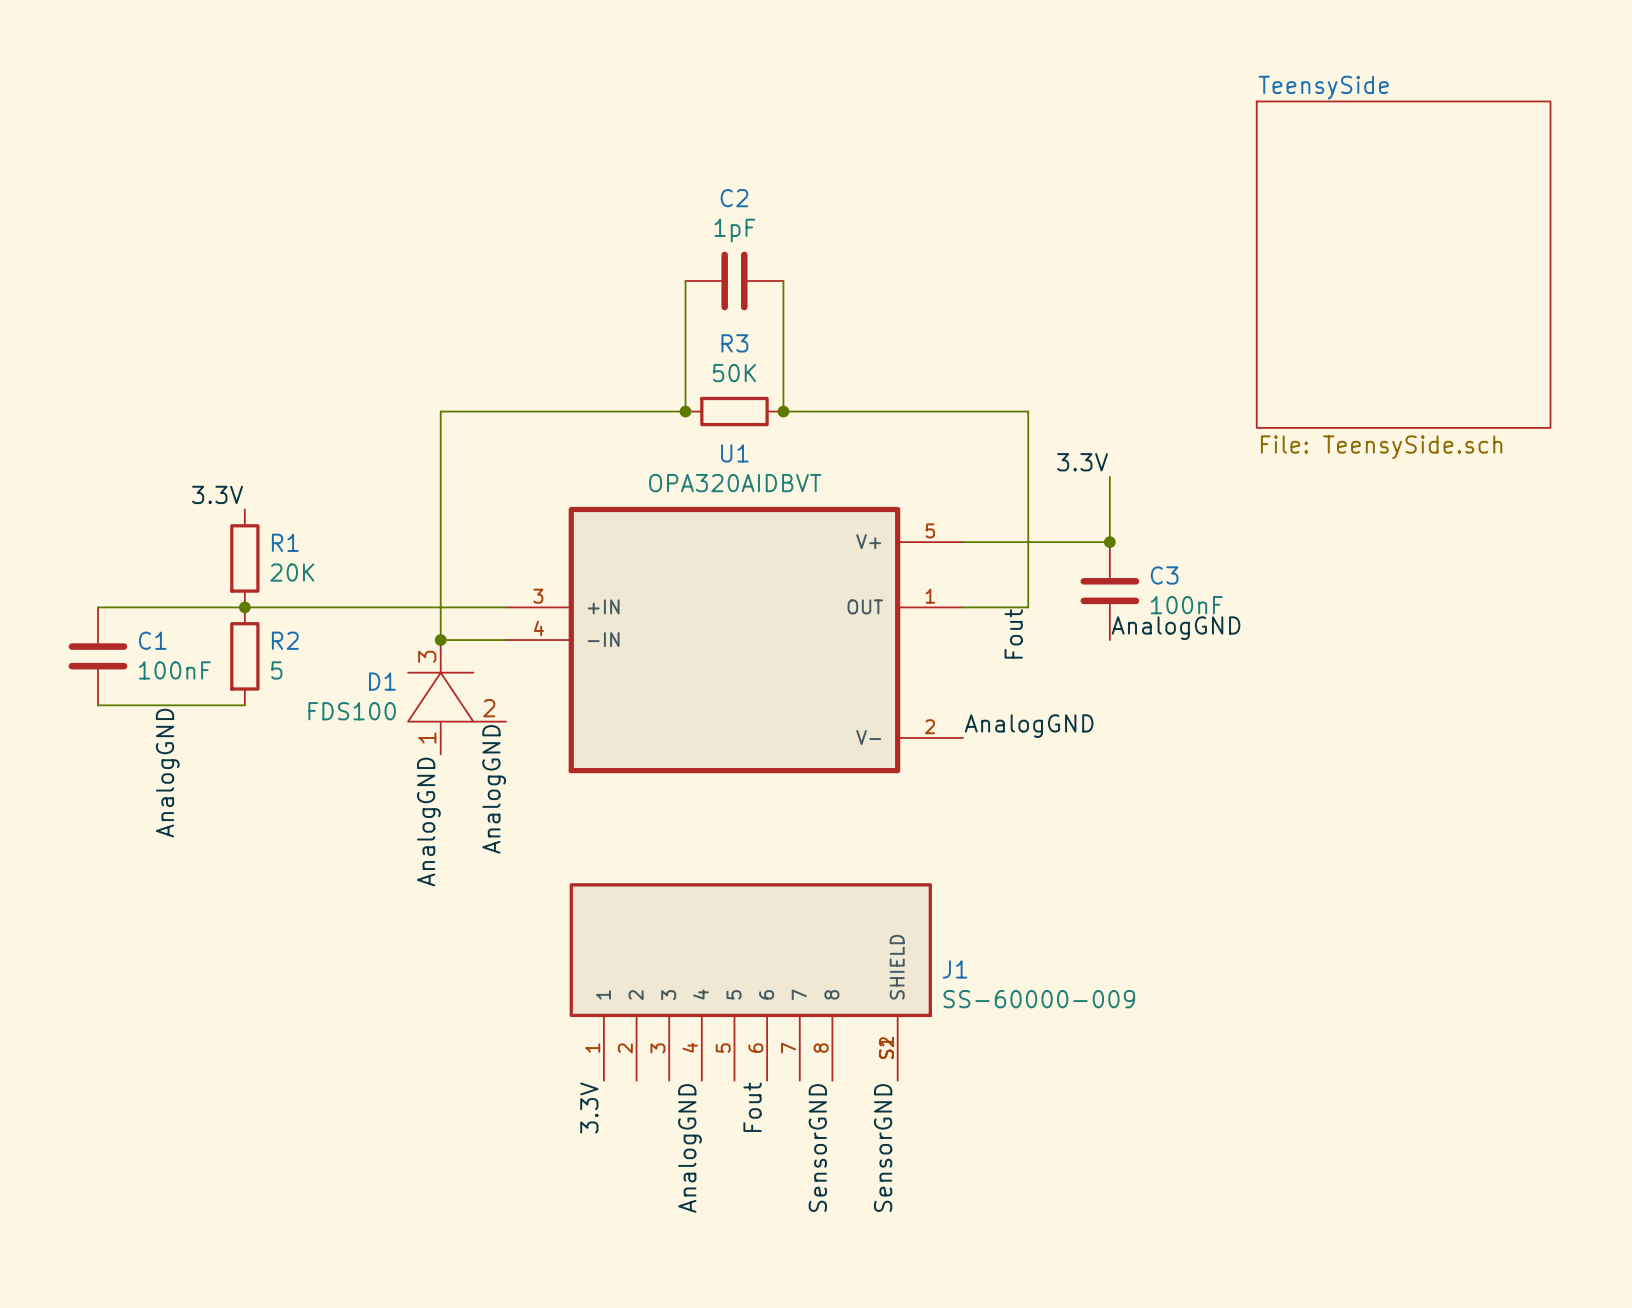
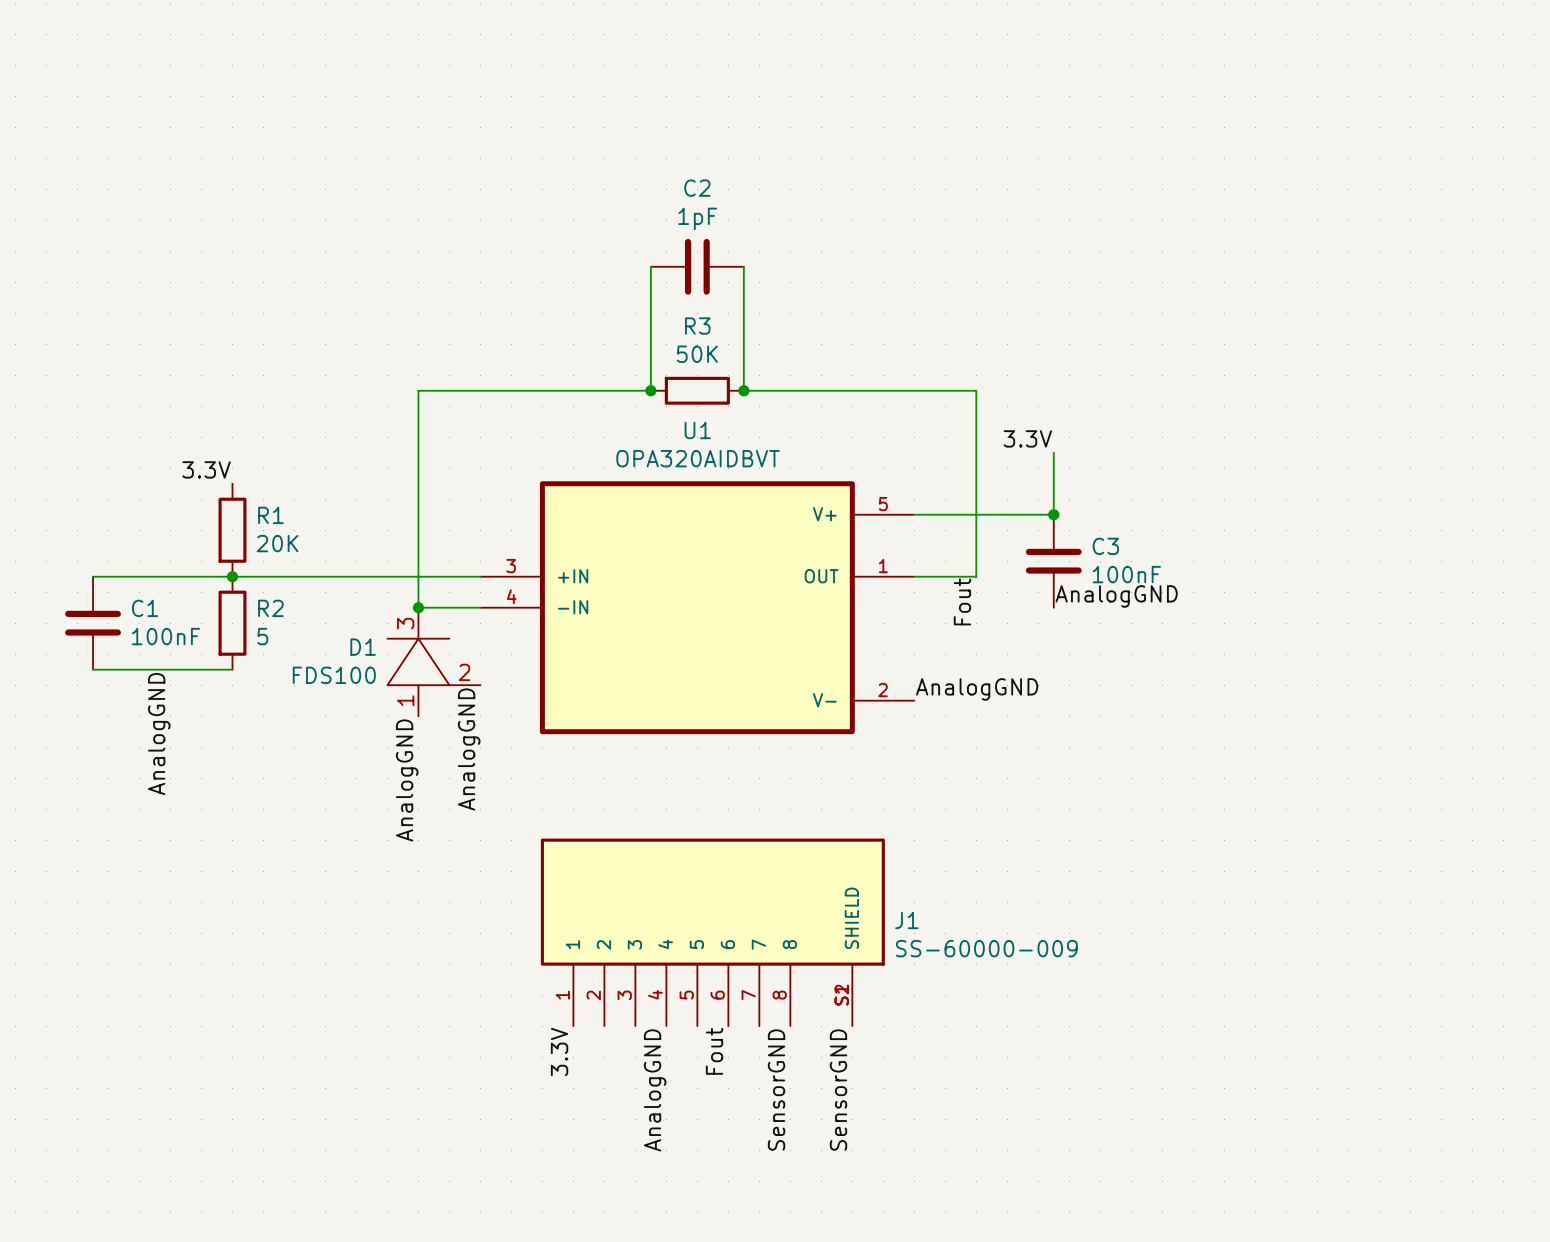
sheet TeensySide: File: TeensySide.sch (1403, 264) -> none

